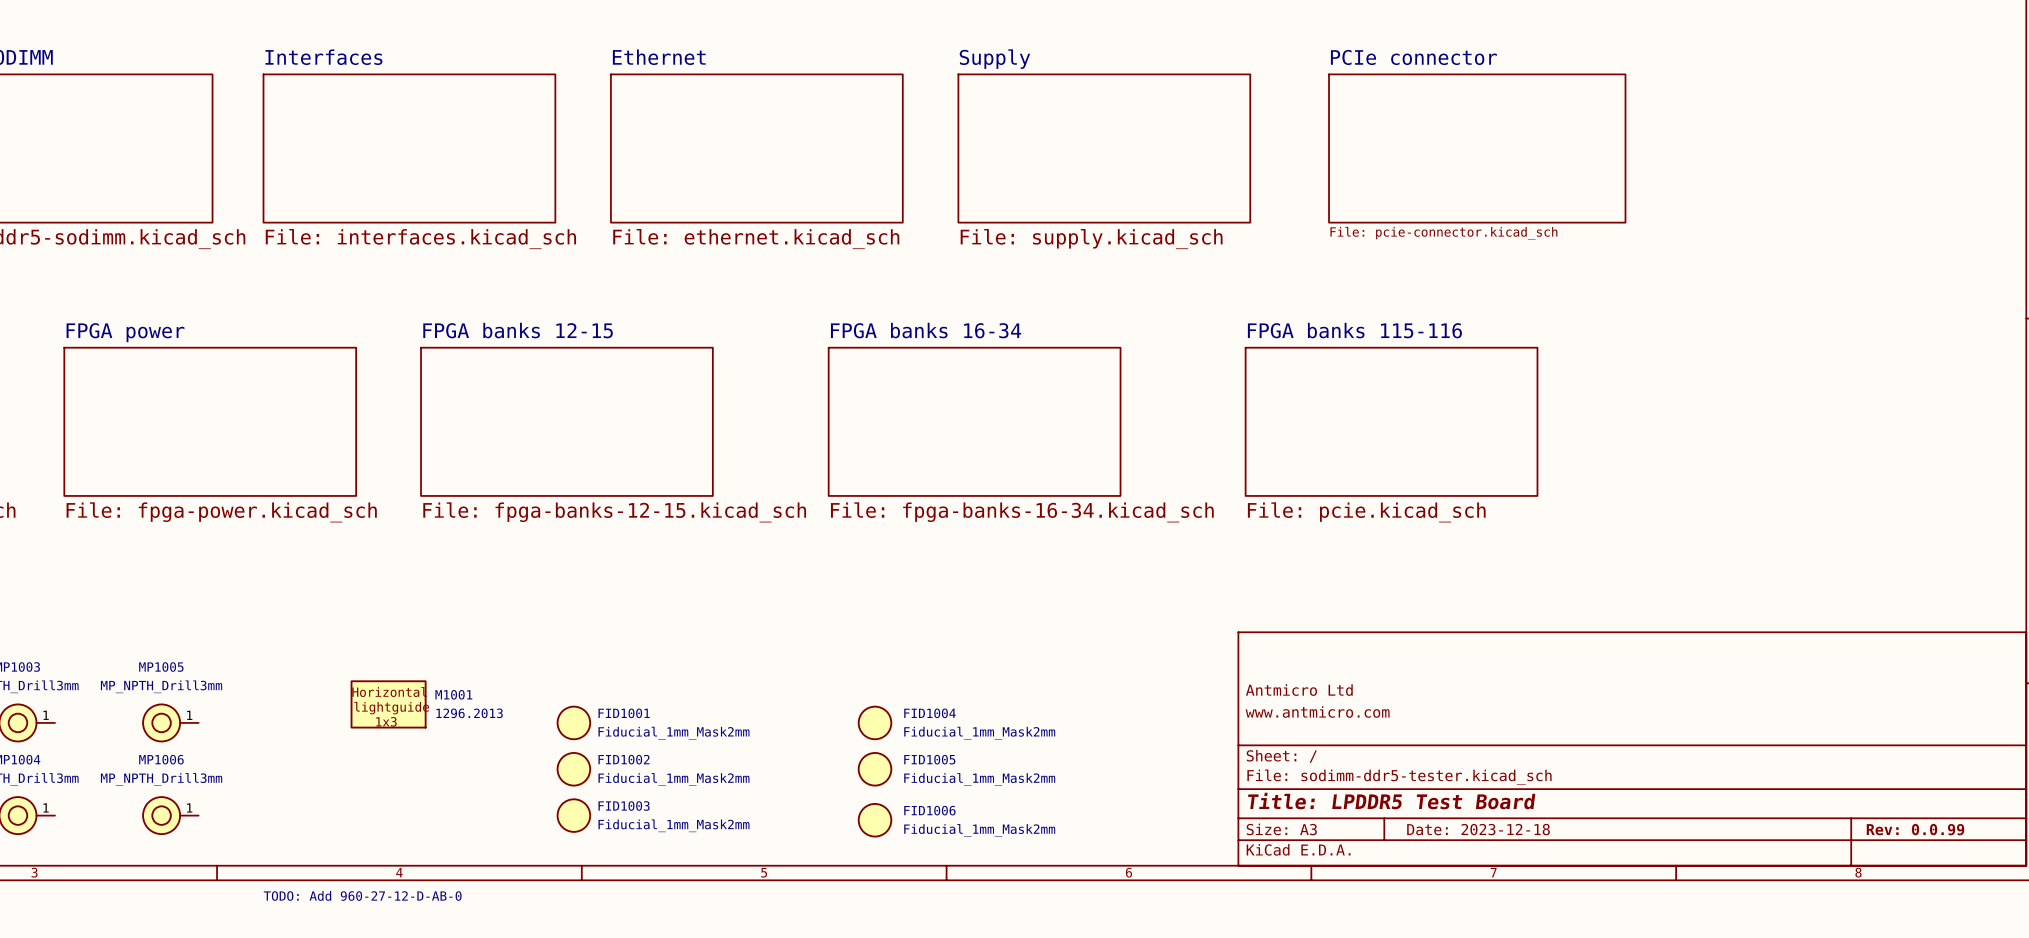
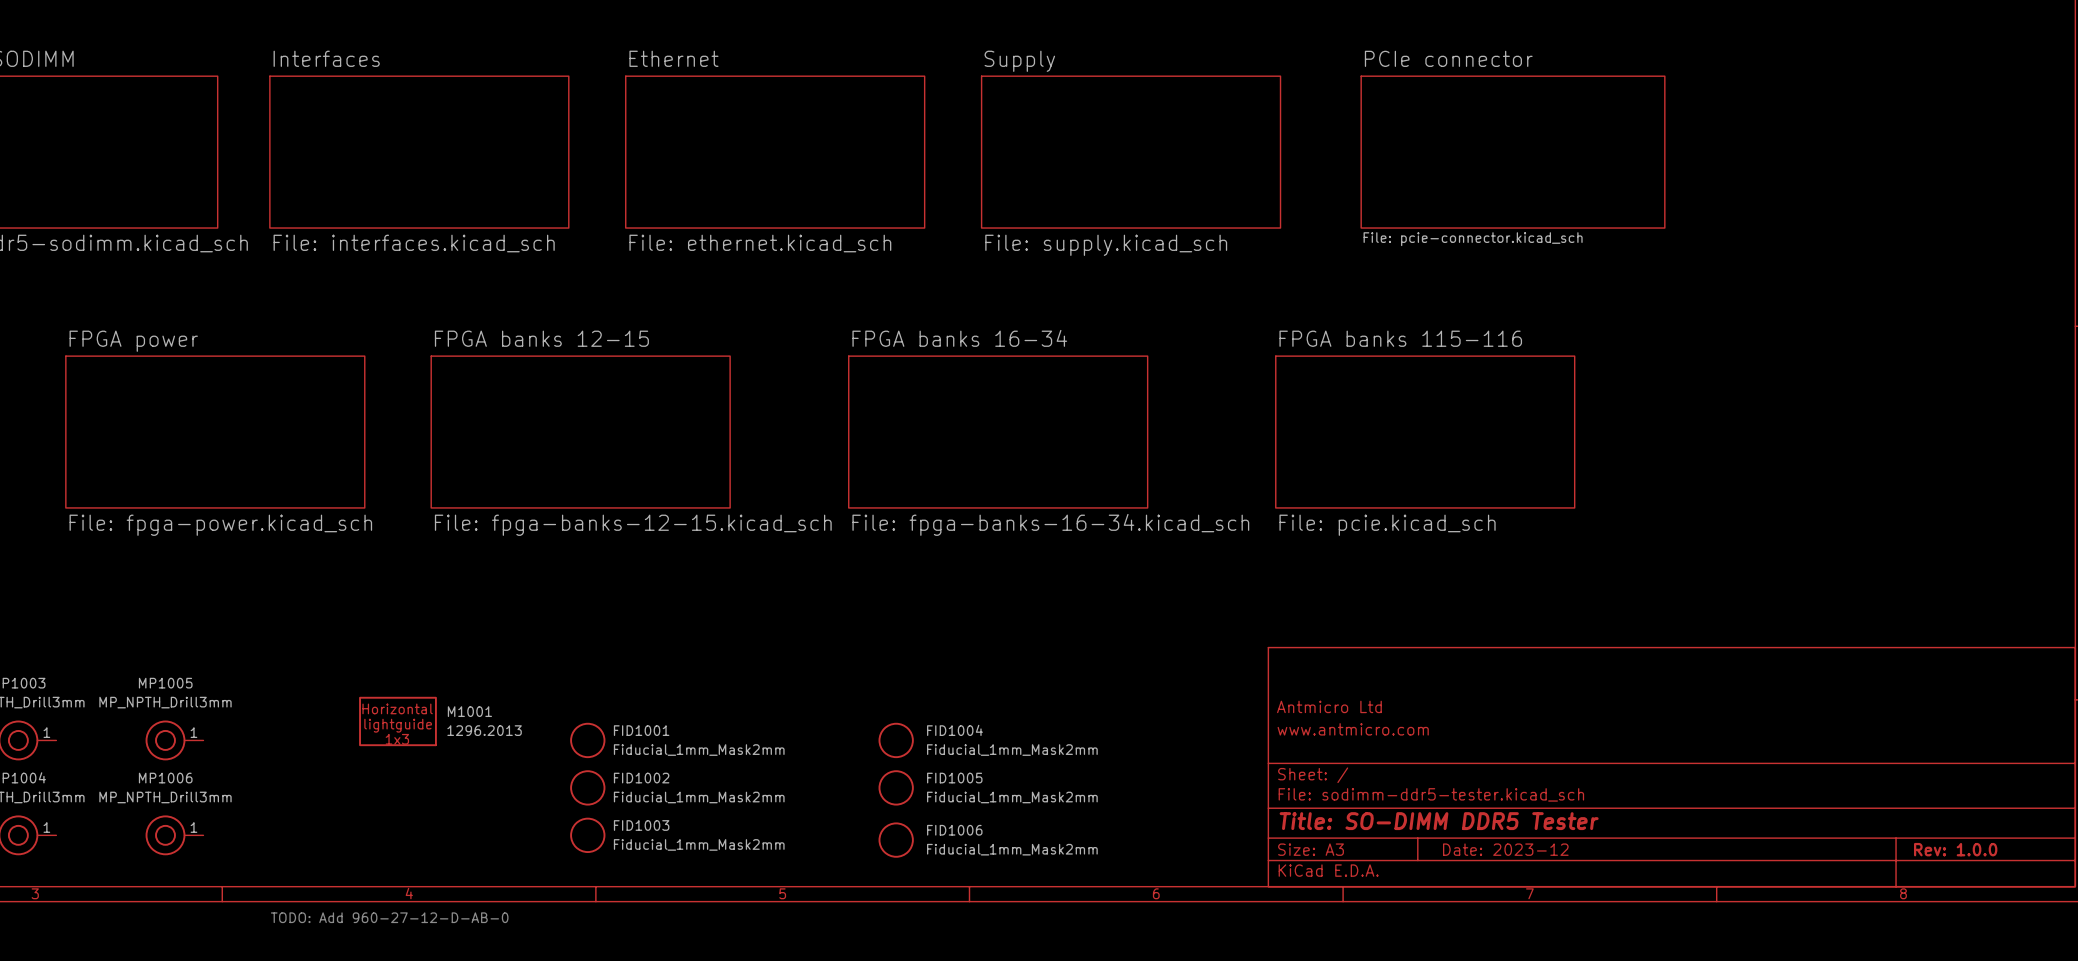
title block: Title: LPDDR5 Test Board (1391, 801) -> Title: SO-DIMM DDR5 Tester (1439, 821)
title block: Date: 2023-12-18 (1478, 829) -> Date: 2023-12 (1505, 849)
title block: Rev: 0.0.99 (1915, 829) -> Rev: 1.0.0 (1955, 849)

